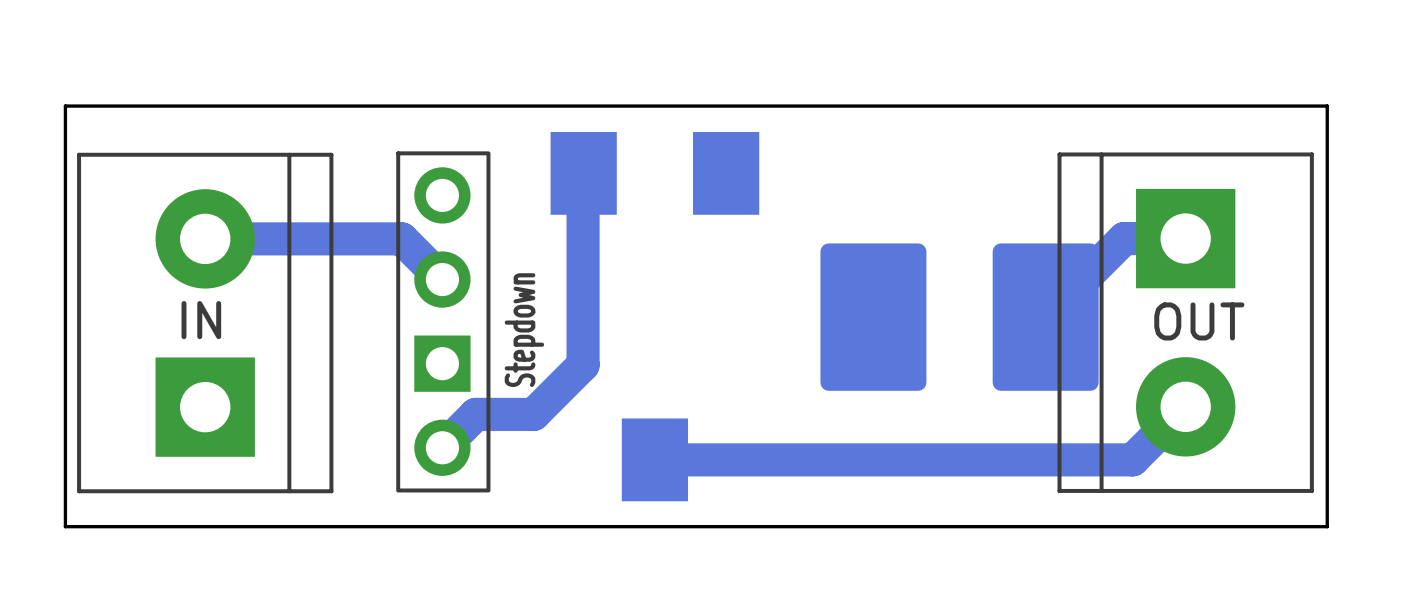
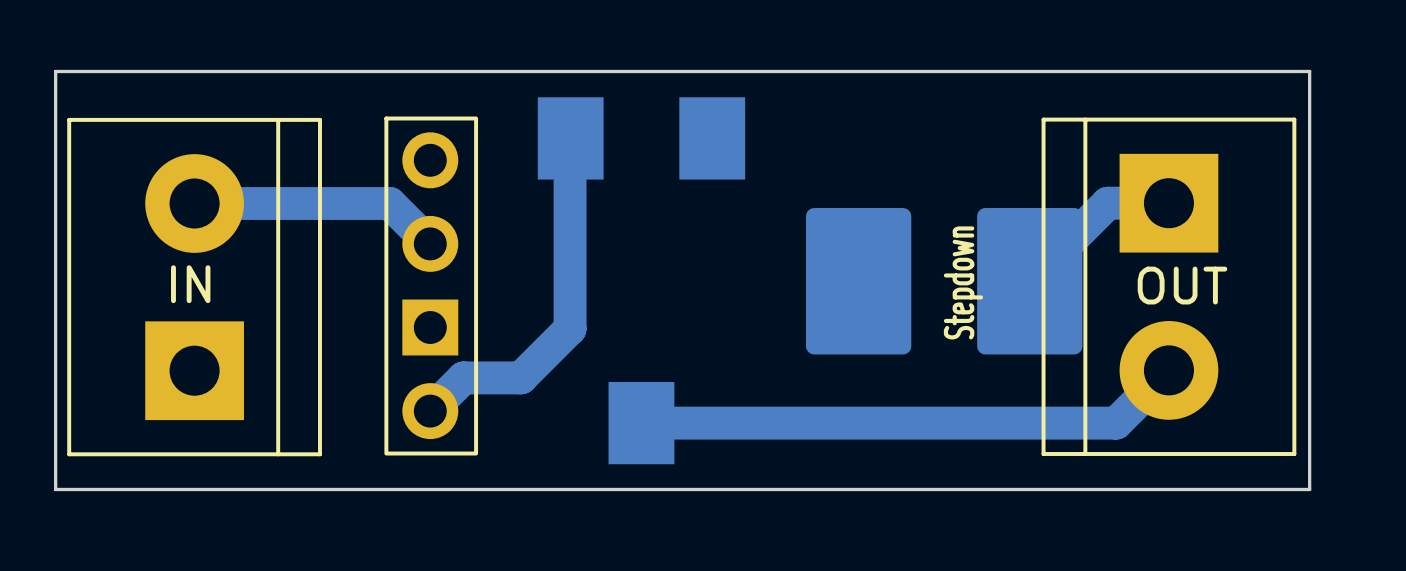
part value position: Stepdown (524, 330) -> Stepdown (963, 282)

